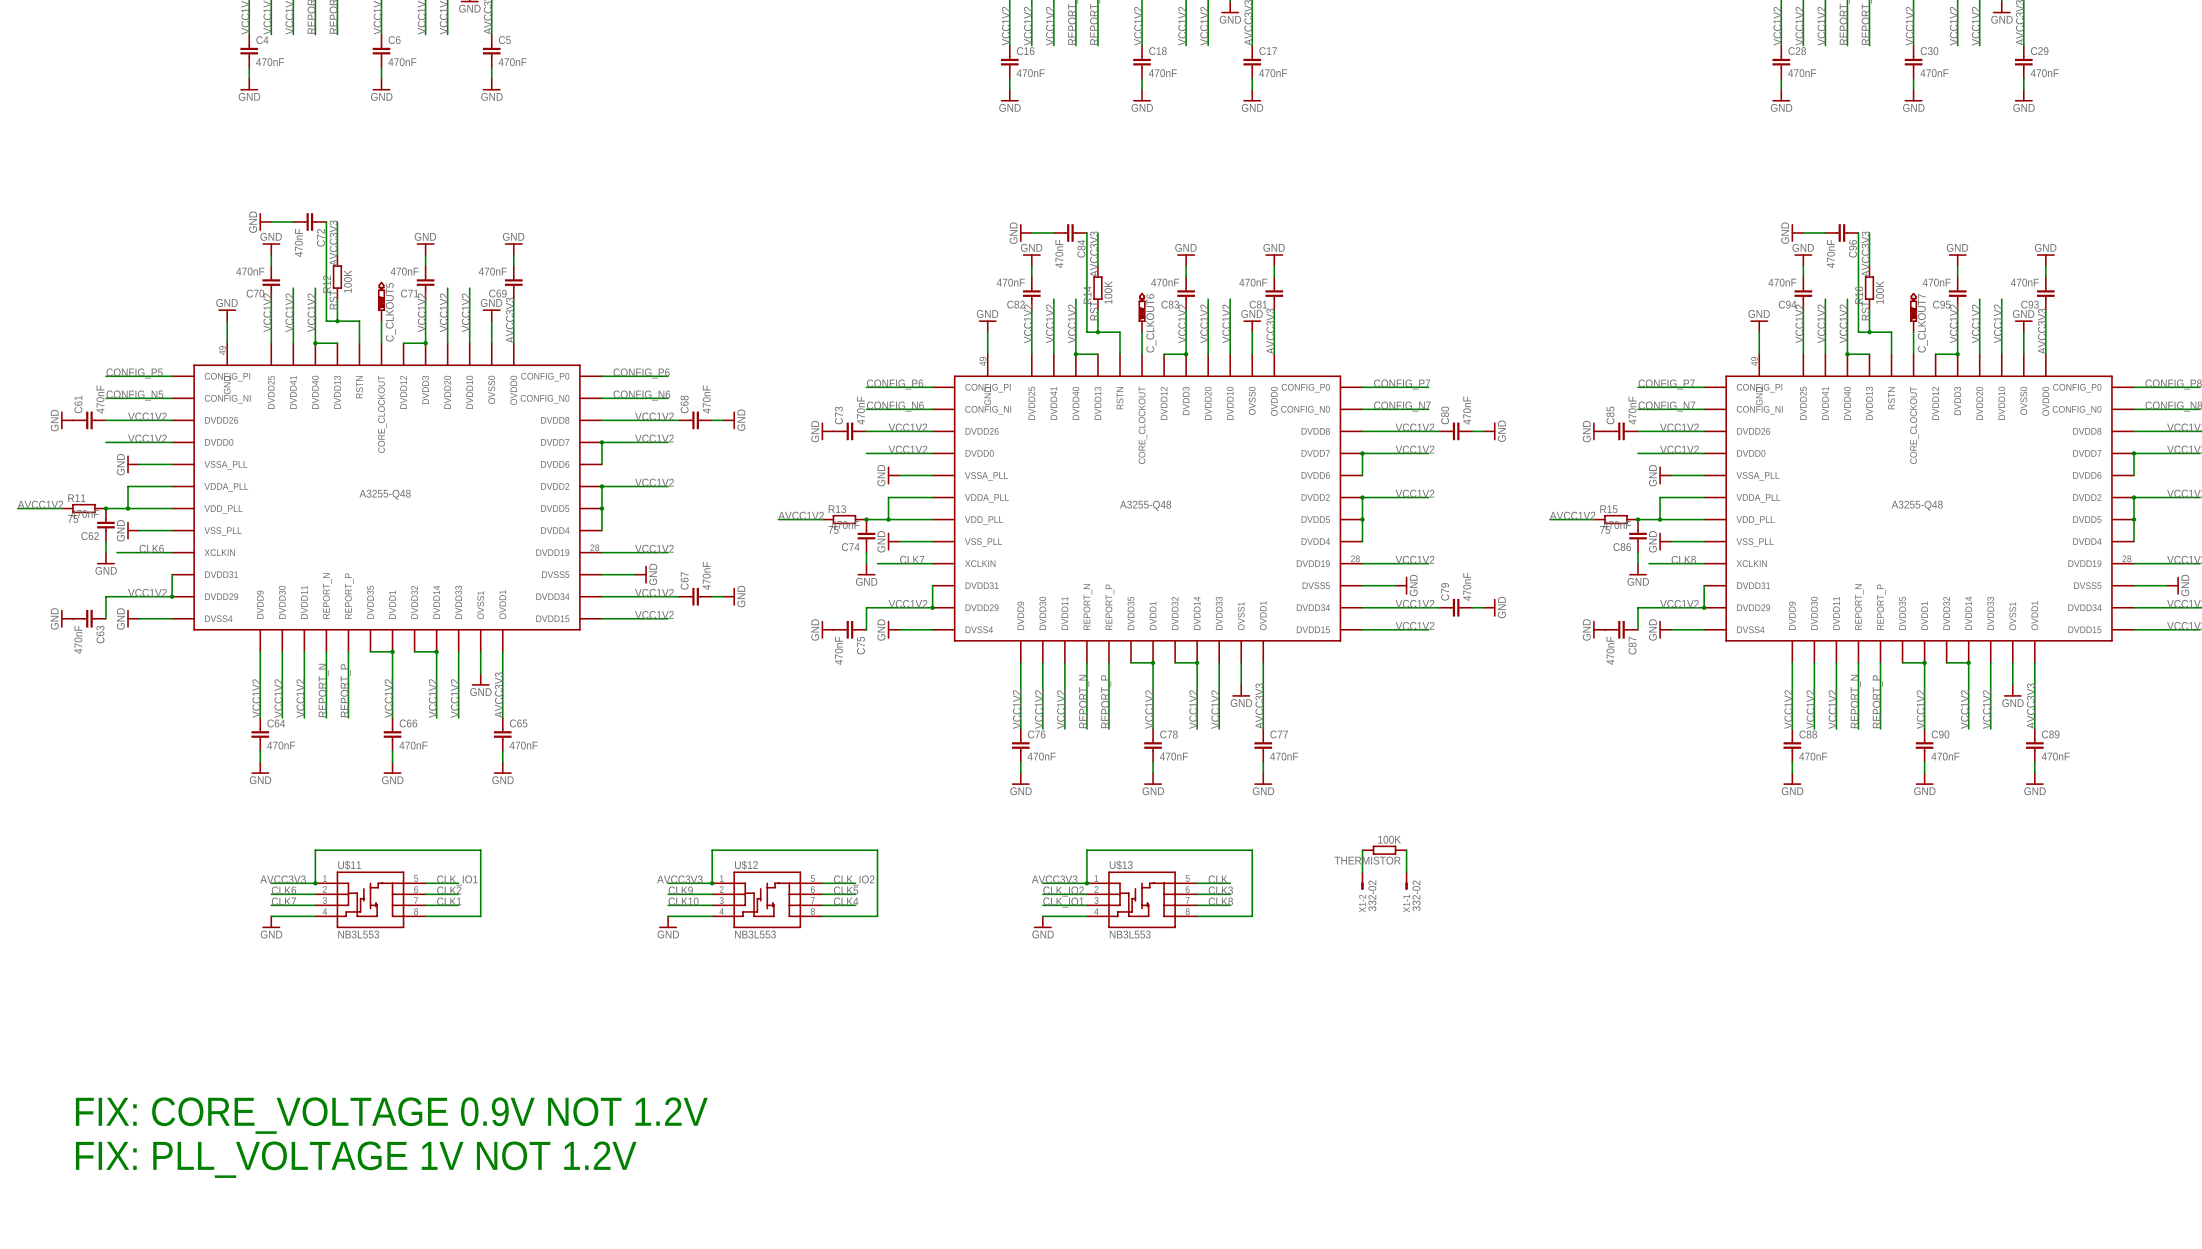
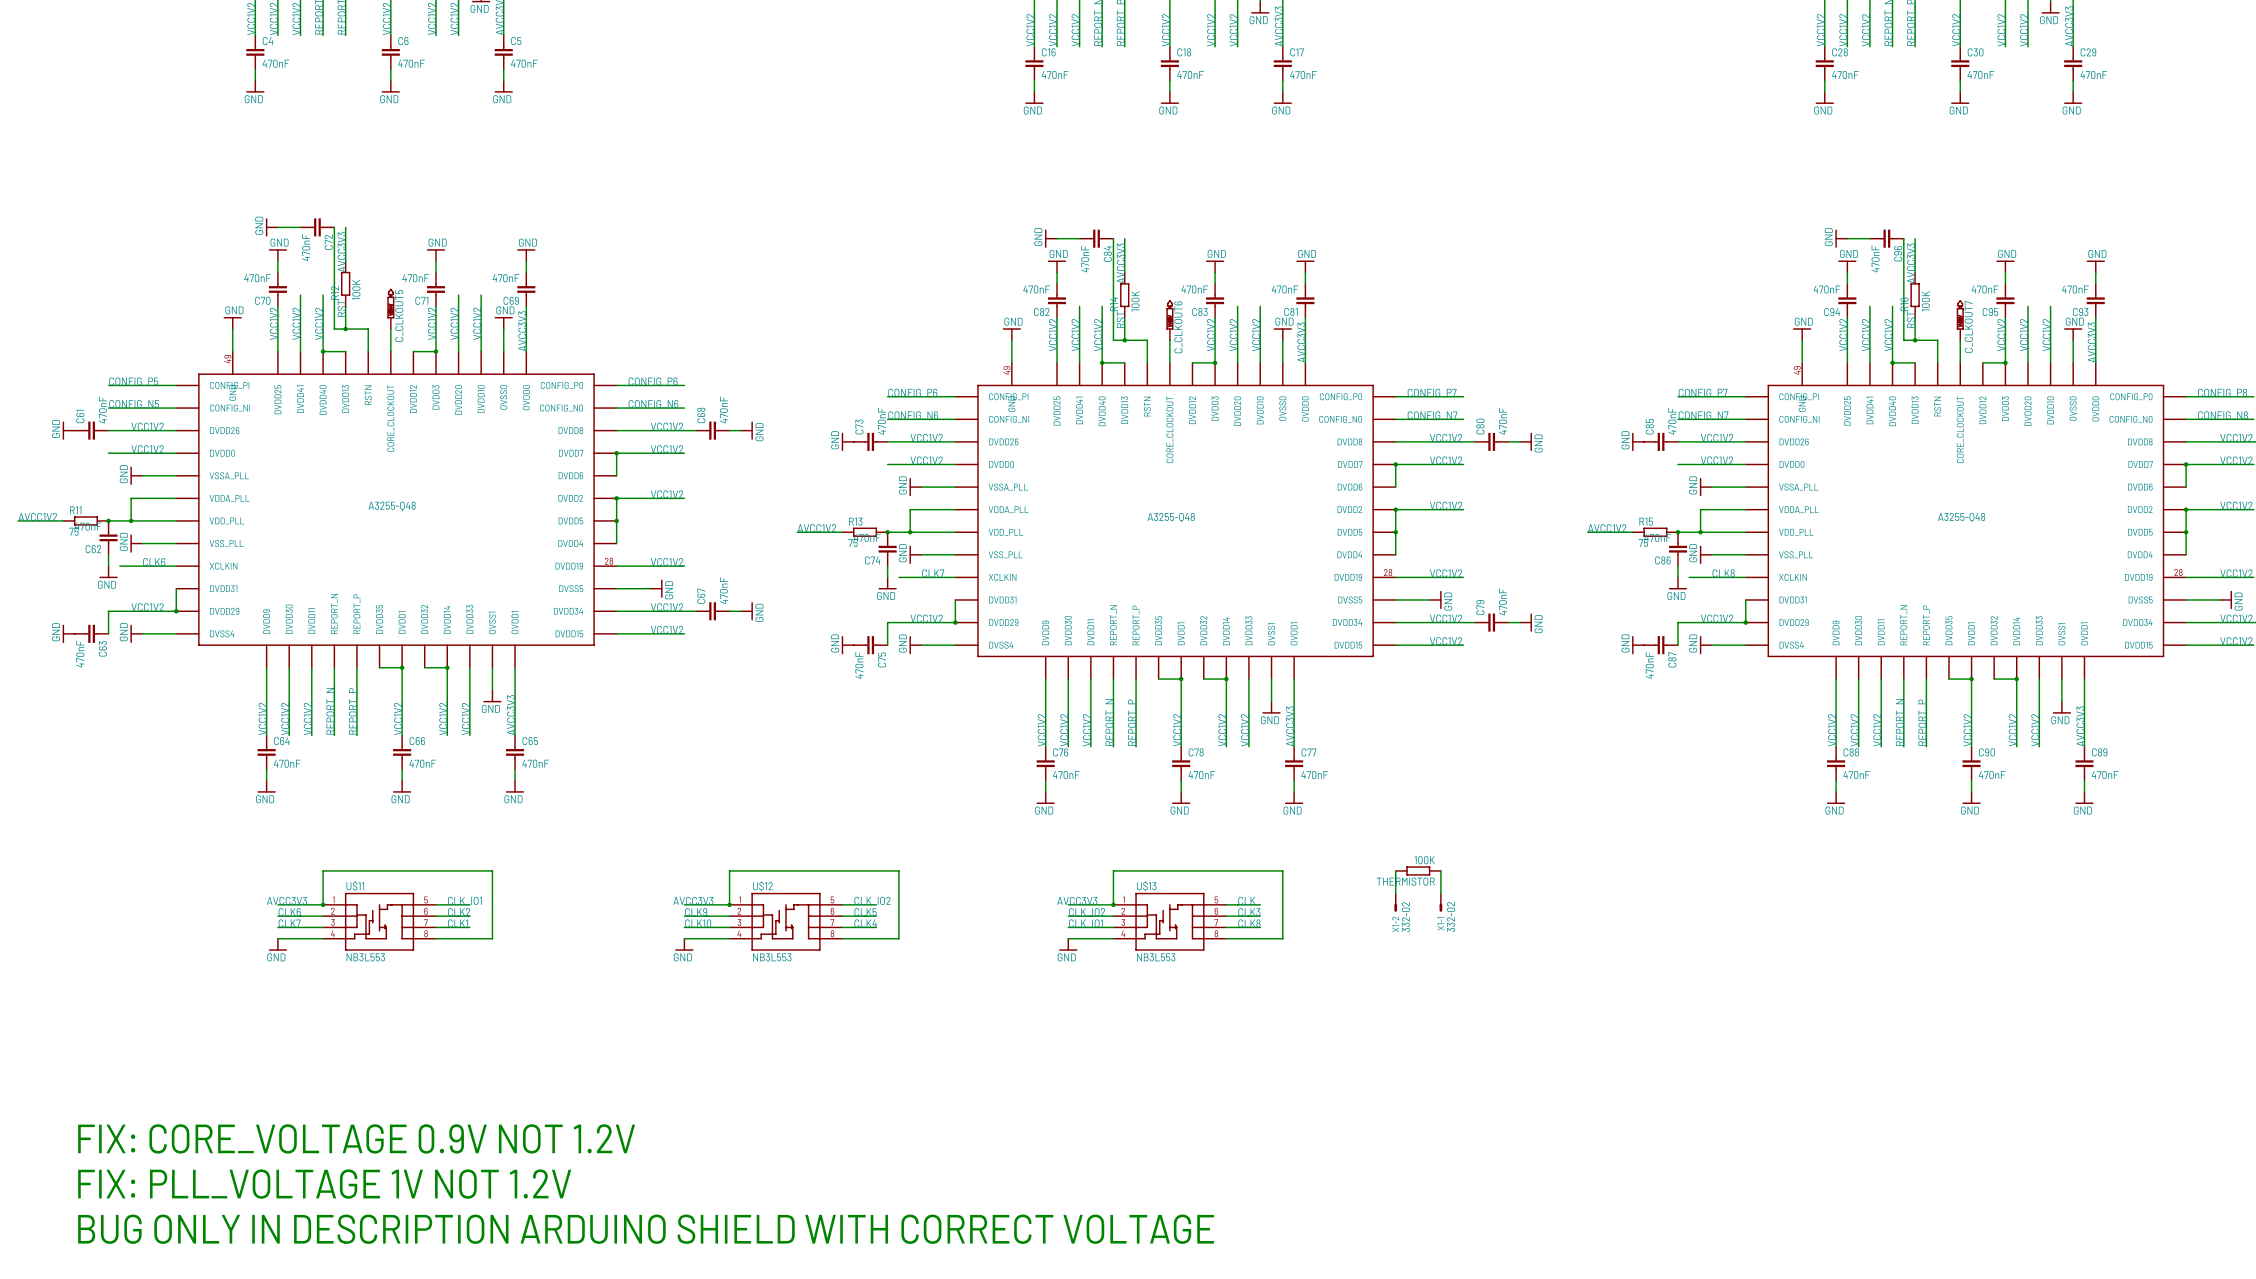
text: none -> BUG ONLY IN DESCRIPTION ARDUINO SHIELD WITH CORRECT VOLTAGE (646, 1229)

